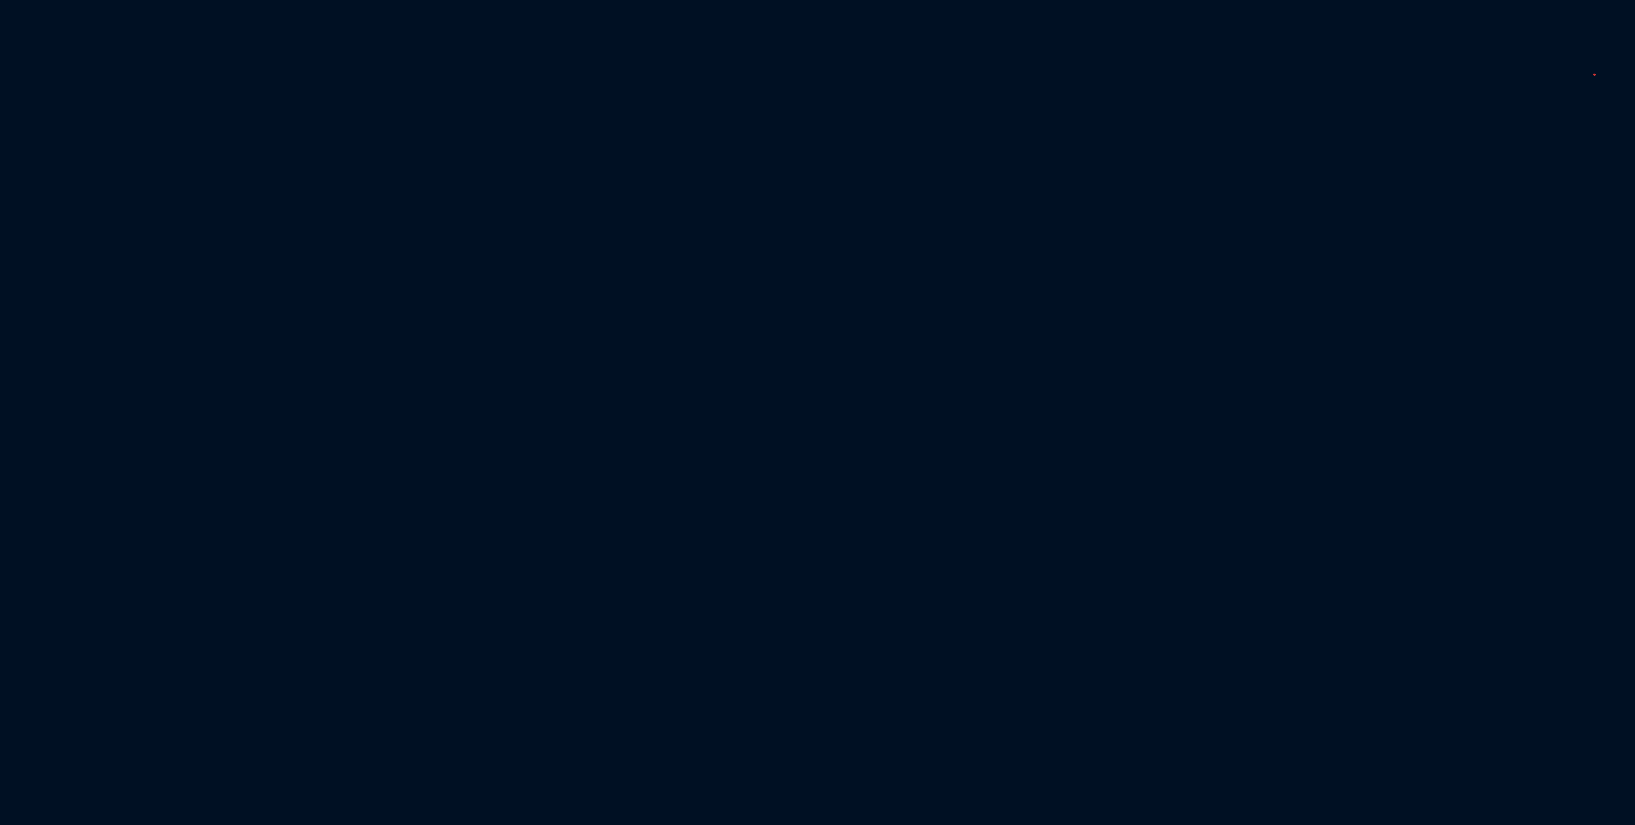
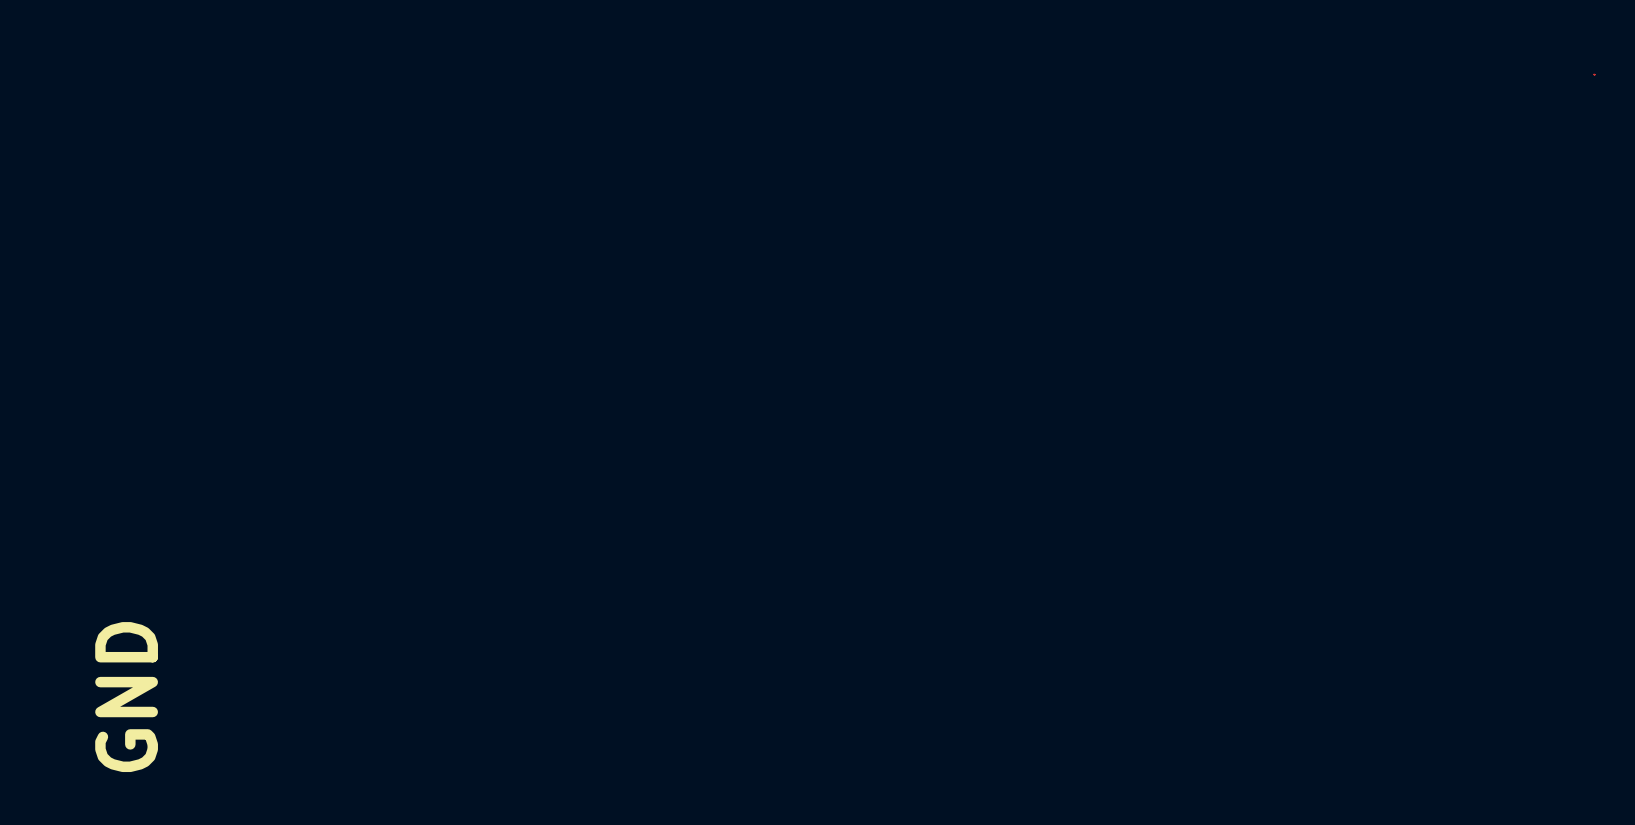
text: none -> GND (126, 697)

